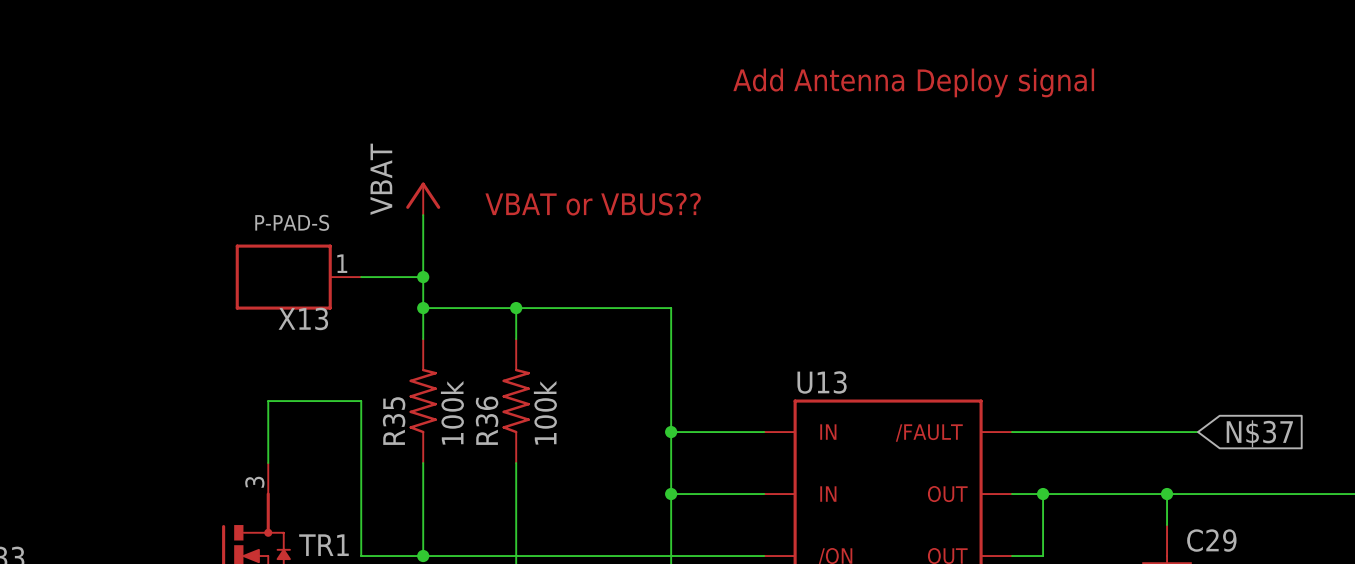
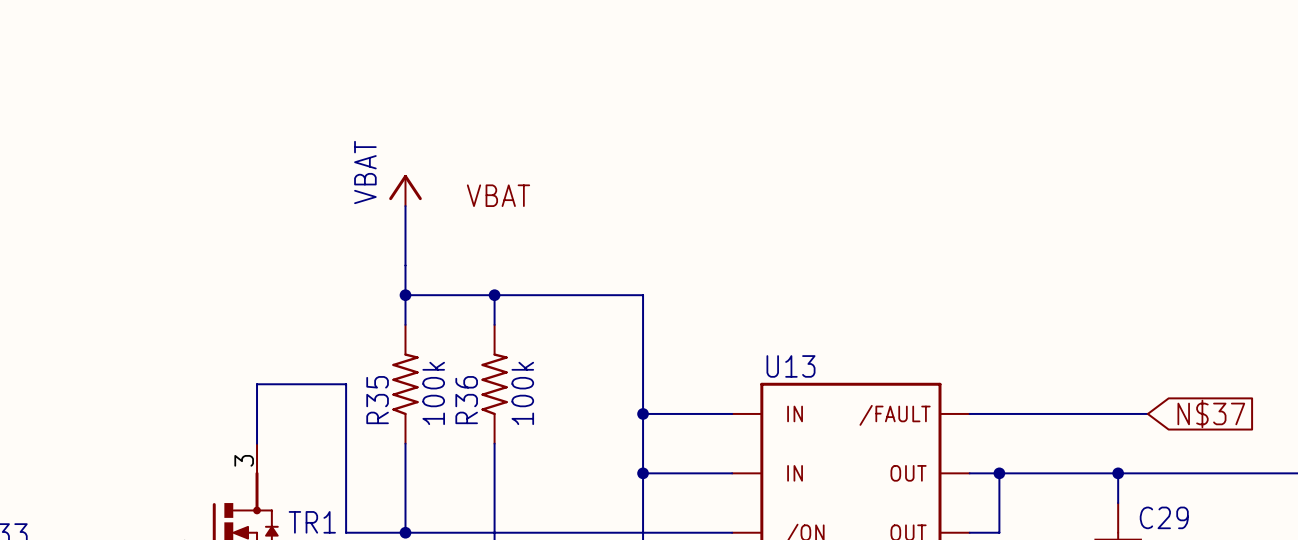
text: Add Antenna Deploy signal (913, 82) -> none
text: VBAT or VBUS?? (593, 204) -> VBAT (498, 195)
X13: P-PAD-S (298, 277) -> none
wire: (361, 277) (423, 277) -> none
junction: (423, 277) -> none

